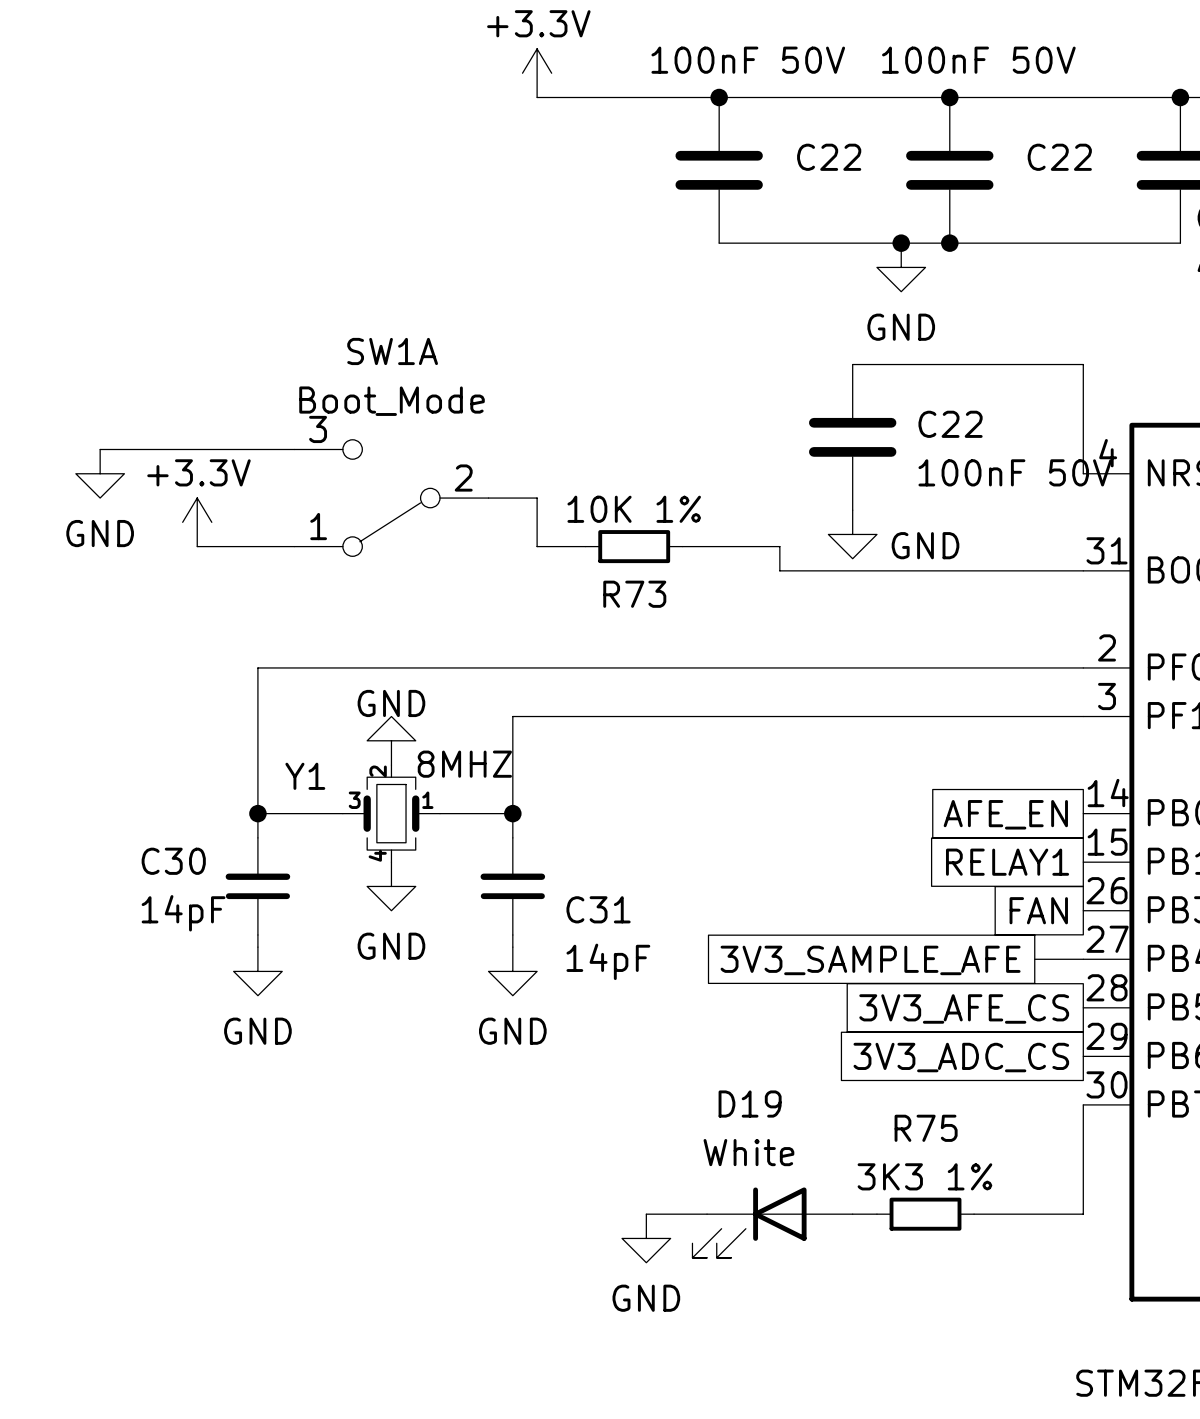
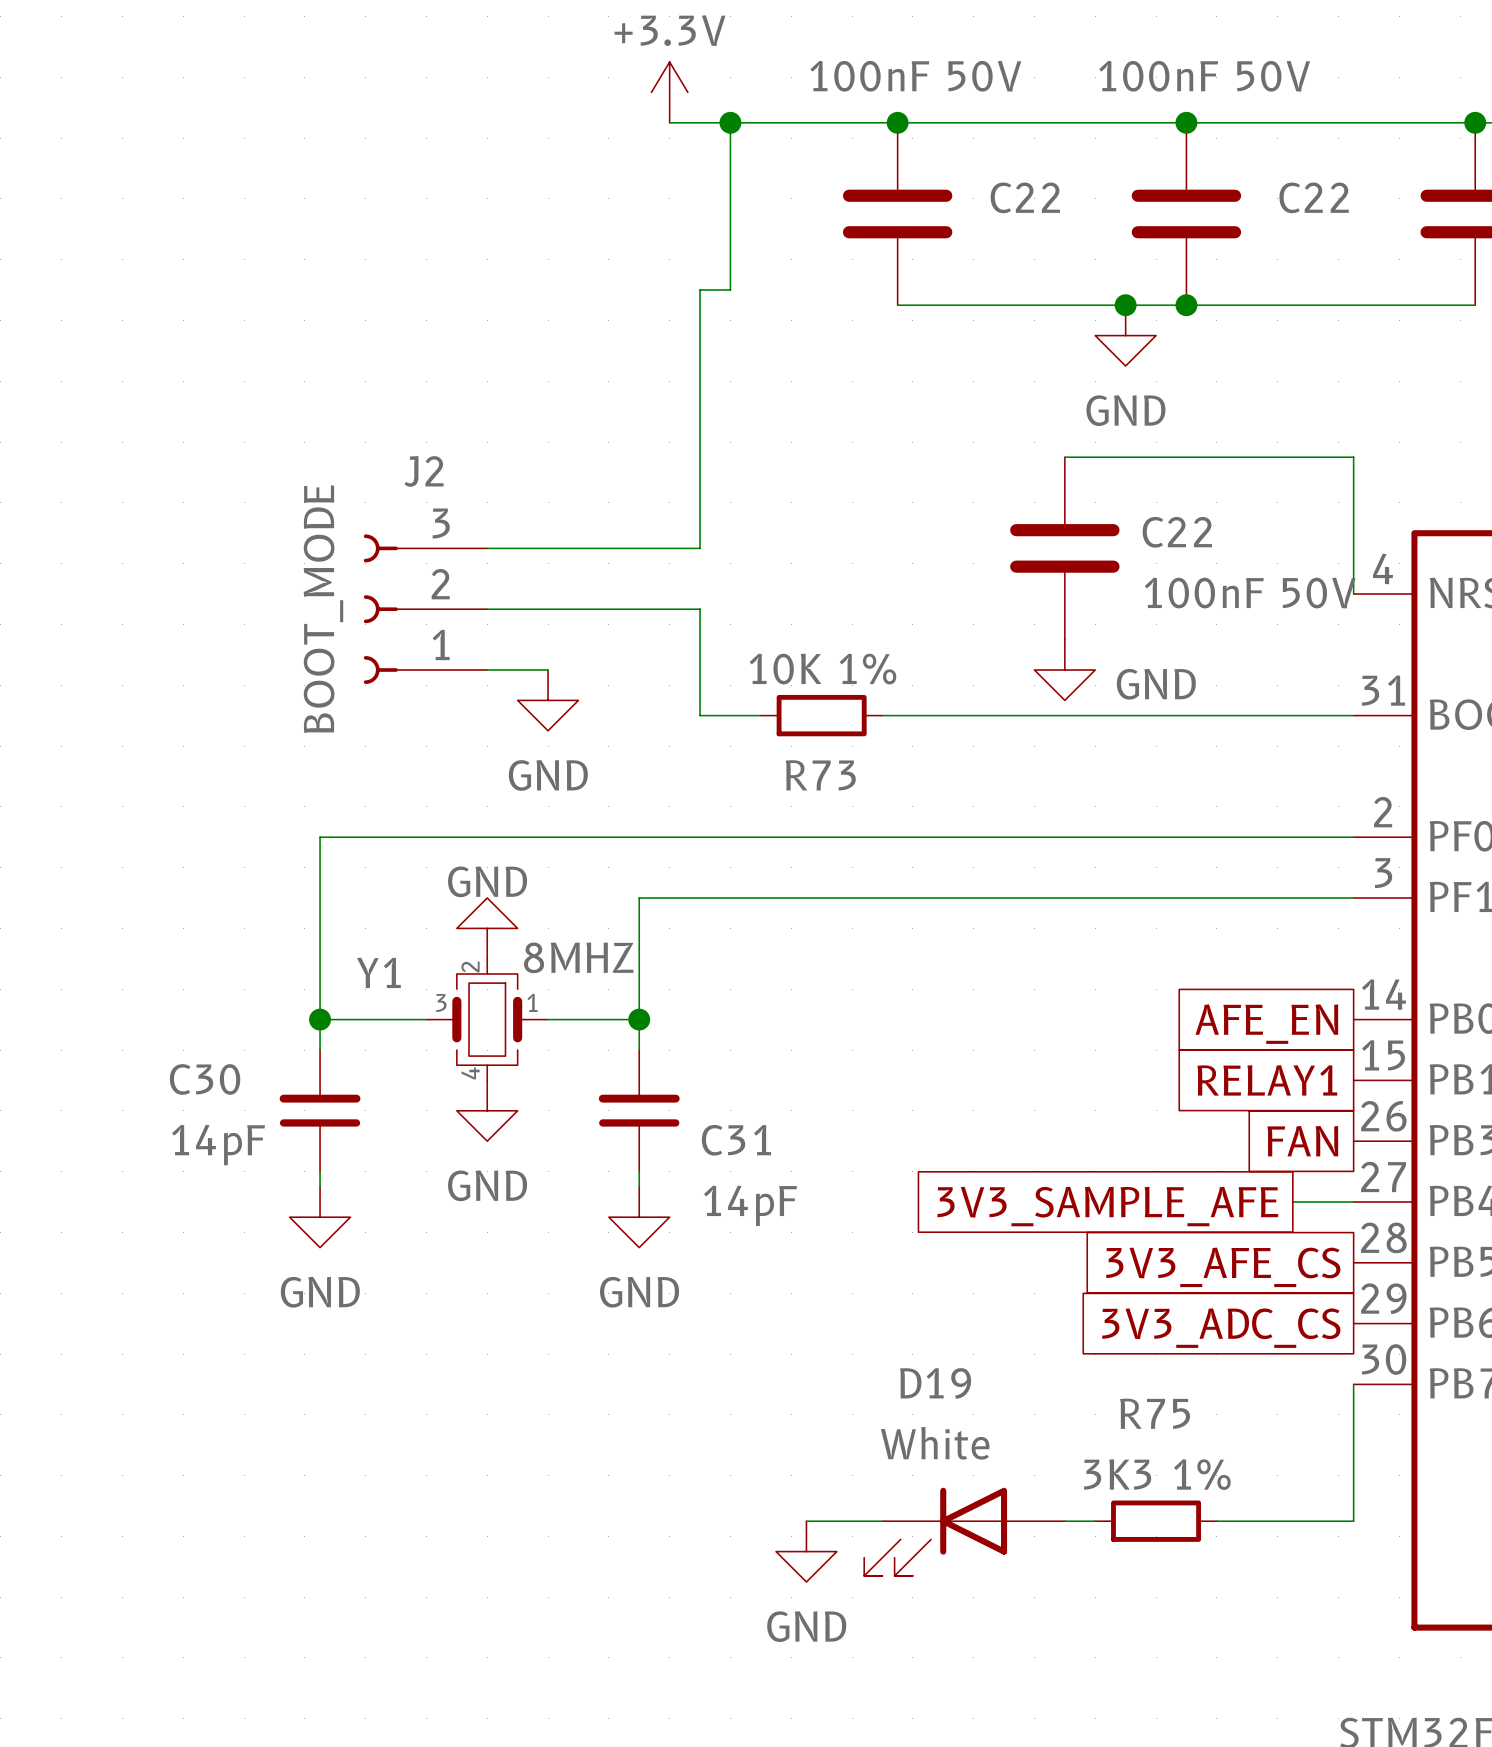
wire: none -> (730, 122) (730, 290) (700, 290) (700, 548) (487, 548)
junction: none -> (730, 122)
wire: (100, 449) (294, 449) -> none
power symbol position: GND (100, 473) -> GND (548, 700)
J2: none -> BOOT_MODE (425, 609)
wire: none -> (487, 609) (700, 609) (700, 715) (760, 715)
SW1A: Boot_Mode (391, 498) -> none
wire: (488, 498) (537, 498) (537, 546) (585, 546) -> none
power symbol: +3.3V (197, 522) -> none
wire: none -> (487, 670) (548, 670)
wire: (197, 546) (294, 546) -> none
R73 position: (634, 546) -> (821, 715)
wire: (682, 546) (779, 546) (779, 570) -> (882, 715) (973, 715)

